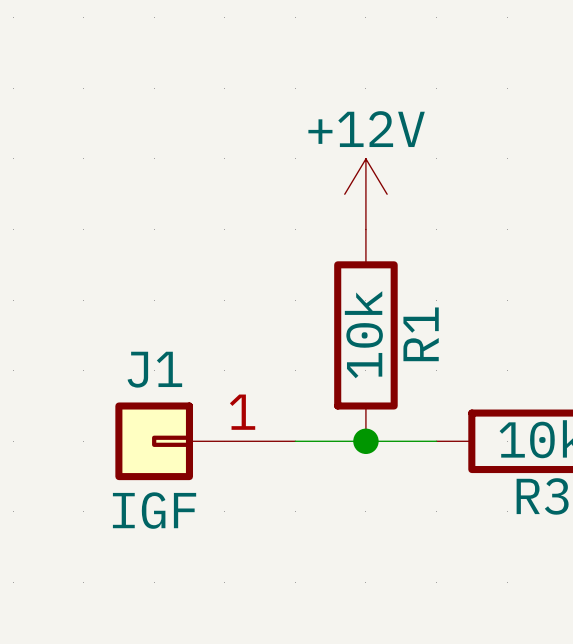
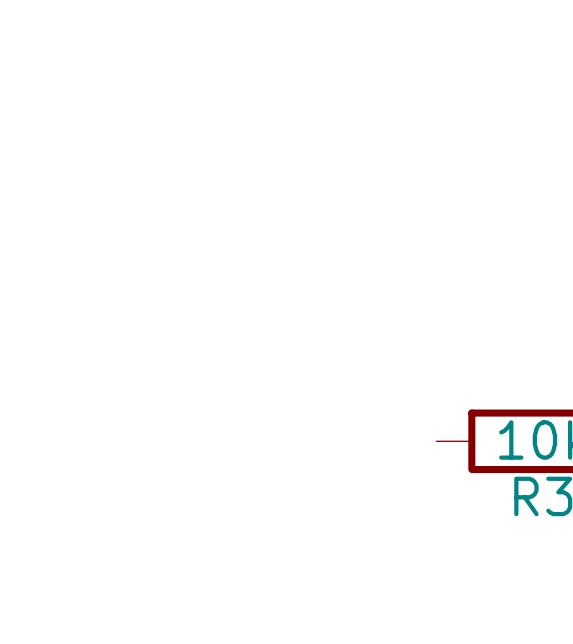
power symbol: +12V (365, 194) -> none
R1: 10k (365, 335) -> none
J1: IGF (205, 441) -> none
wire: (295, 441) (436, 441) -> none
junction: (365, 441) -> none

